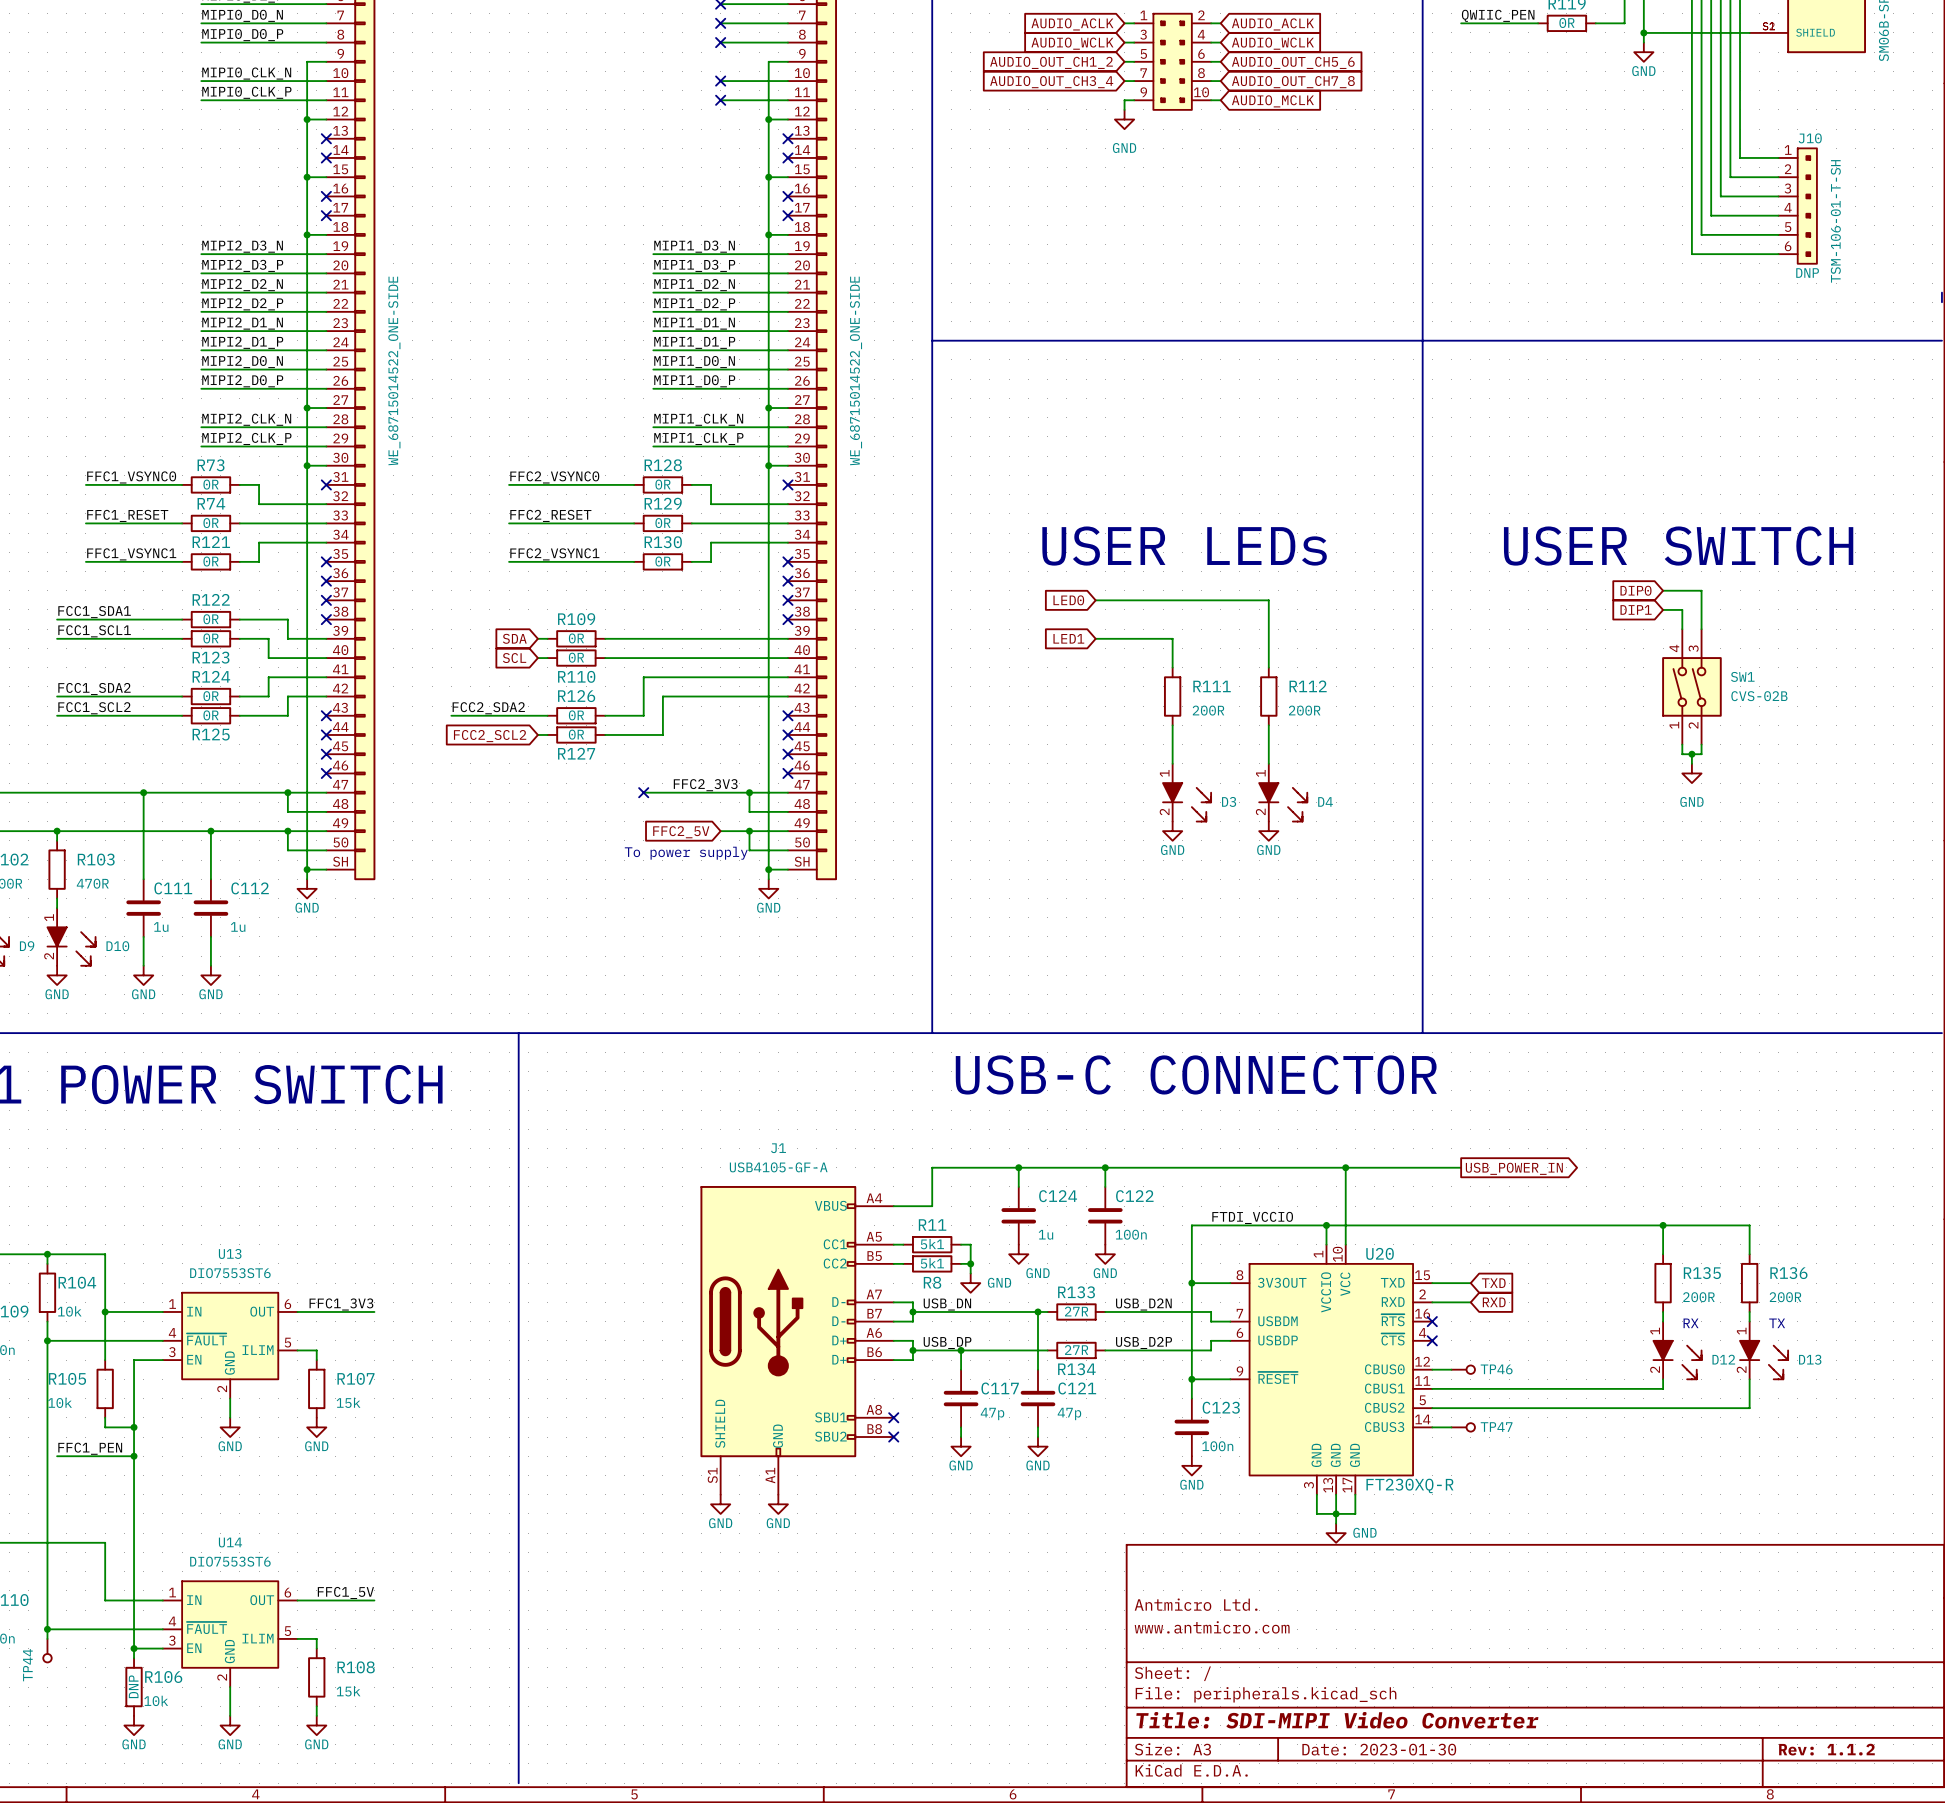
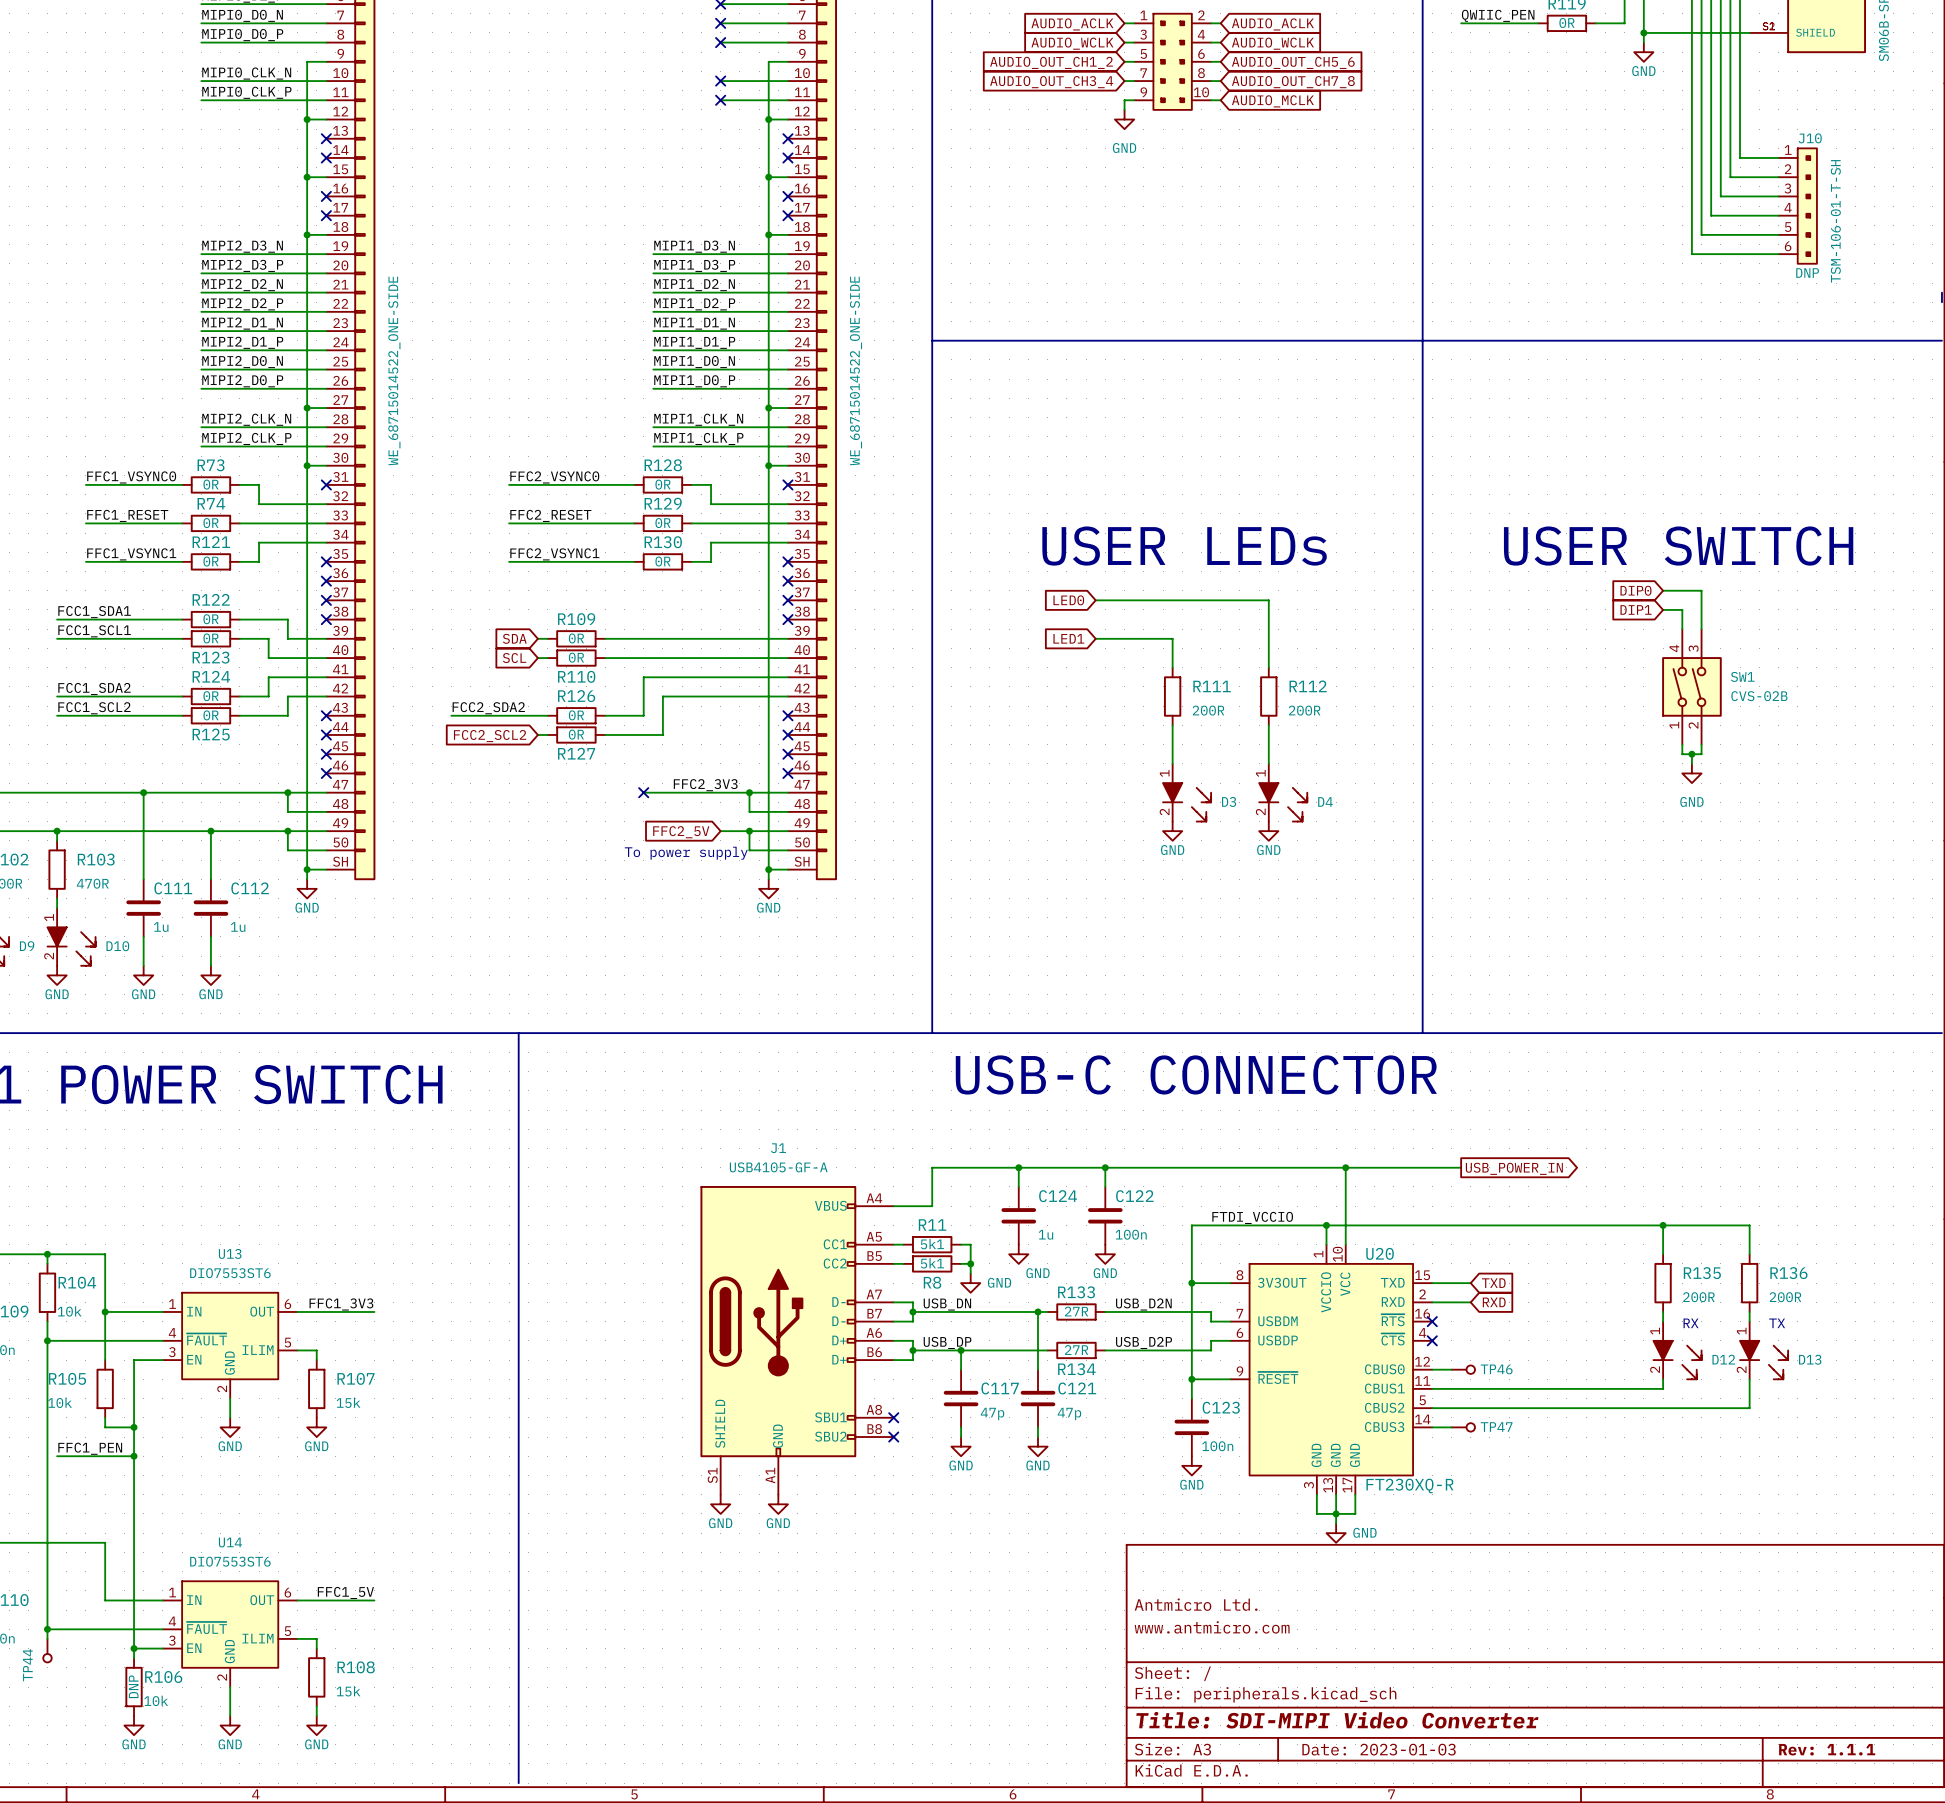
title block: Date: 2023-01-30 (1379, 1749) -> Date: 2023-01-03 (1379, 1749)
title block: Rev: 1.1.2 (1826, 1749) -> Rev: 1.1.1 (1827, 1749)

